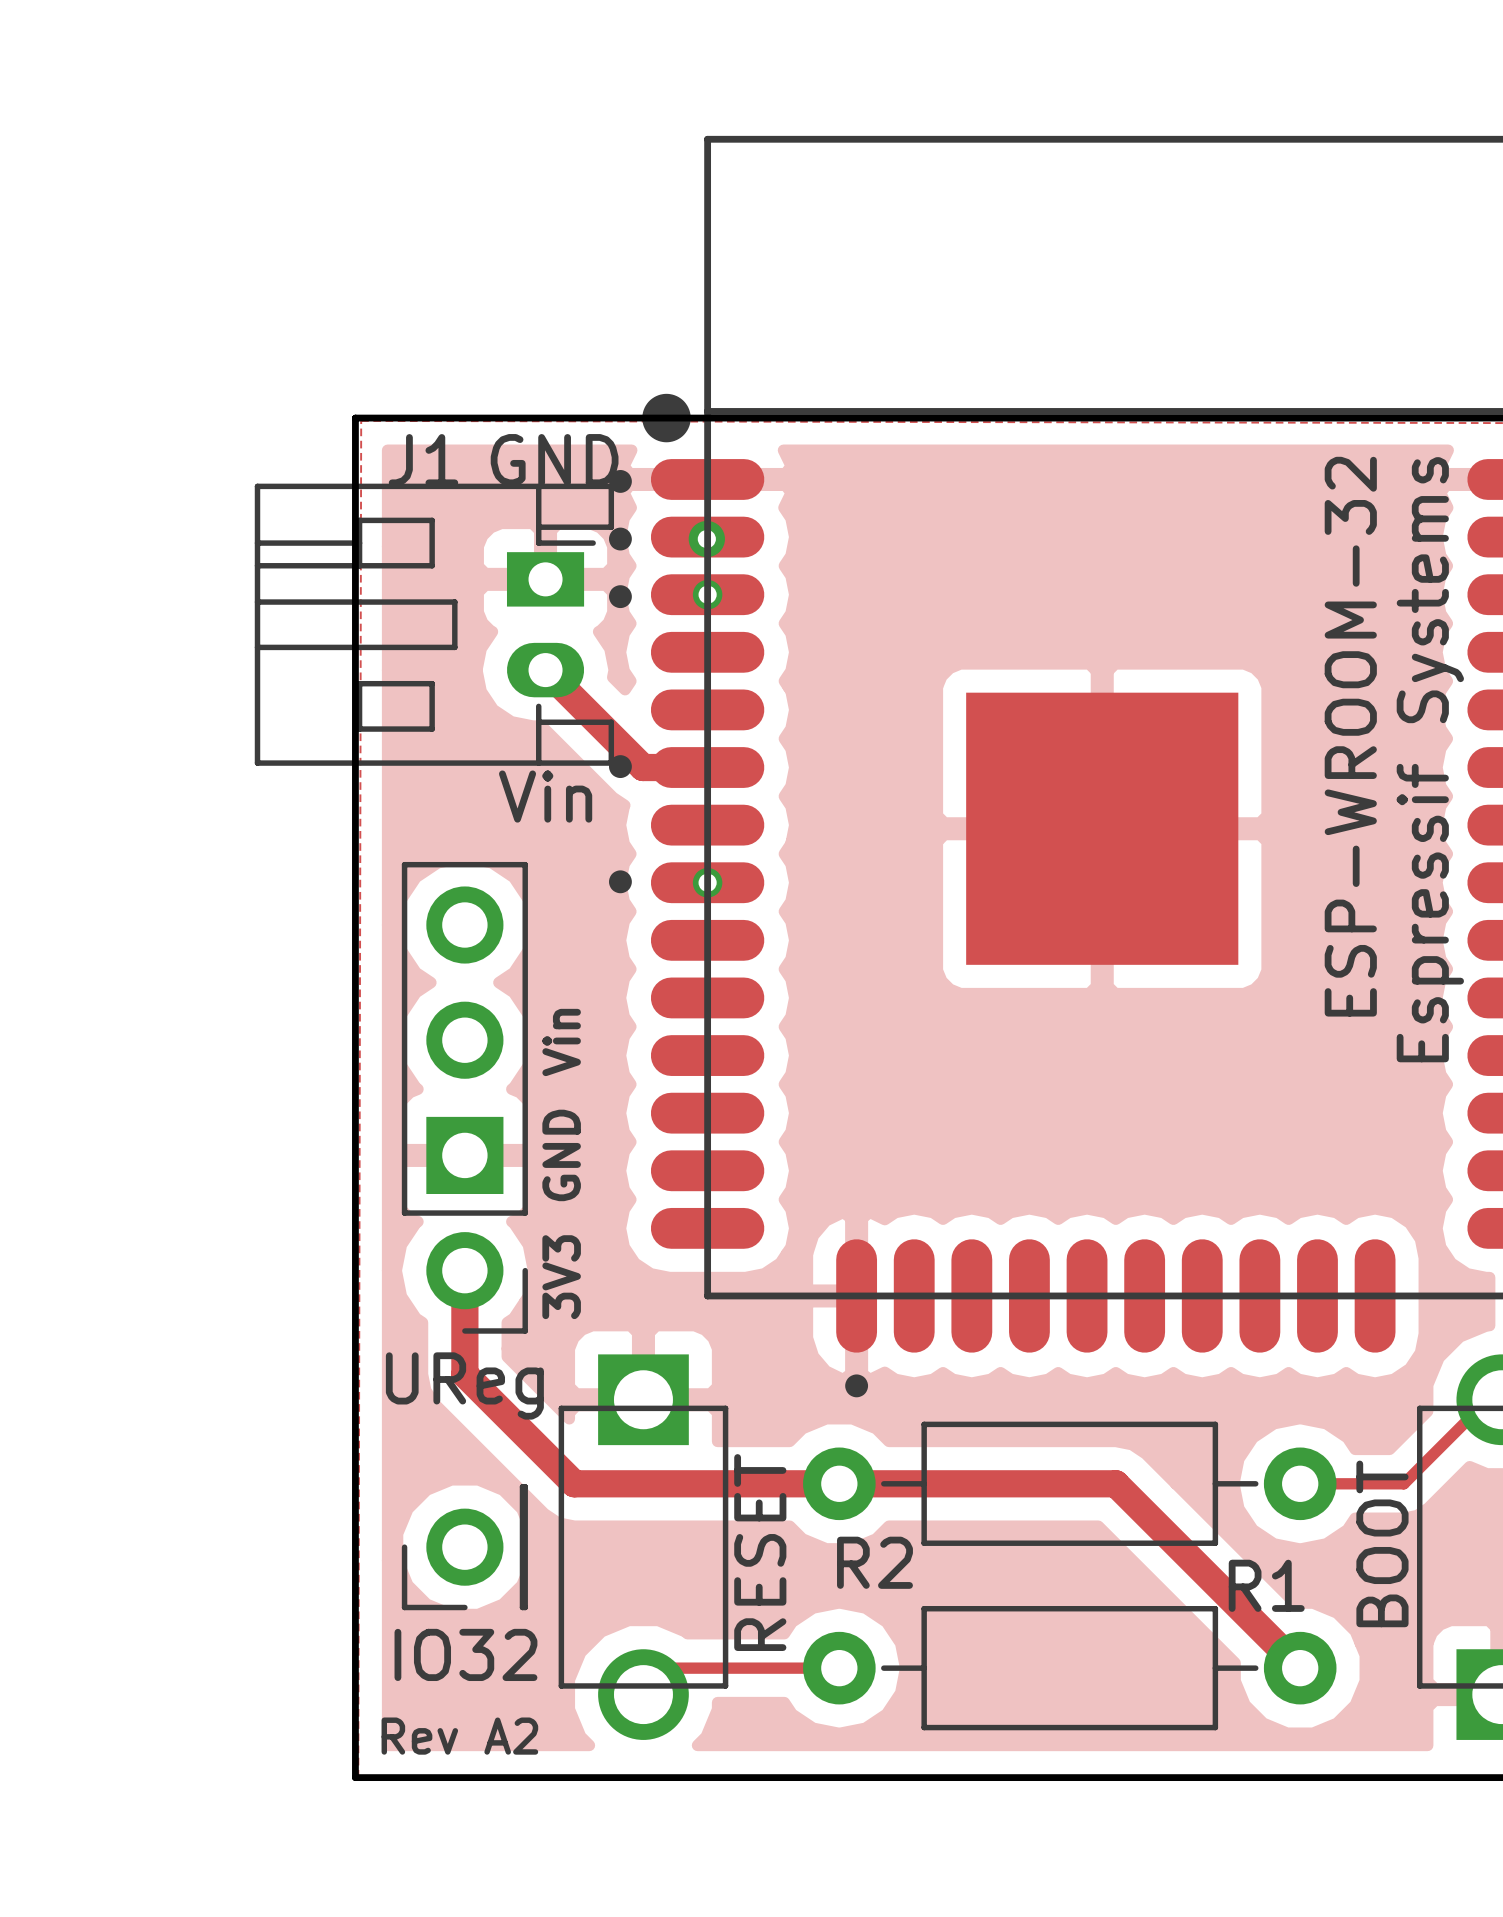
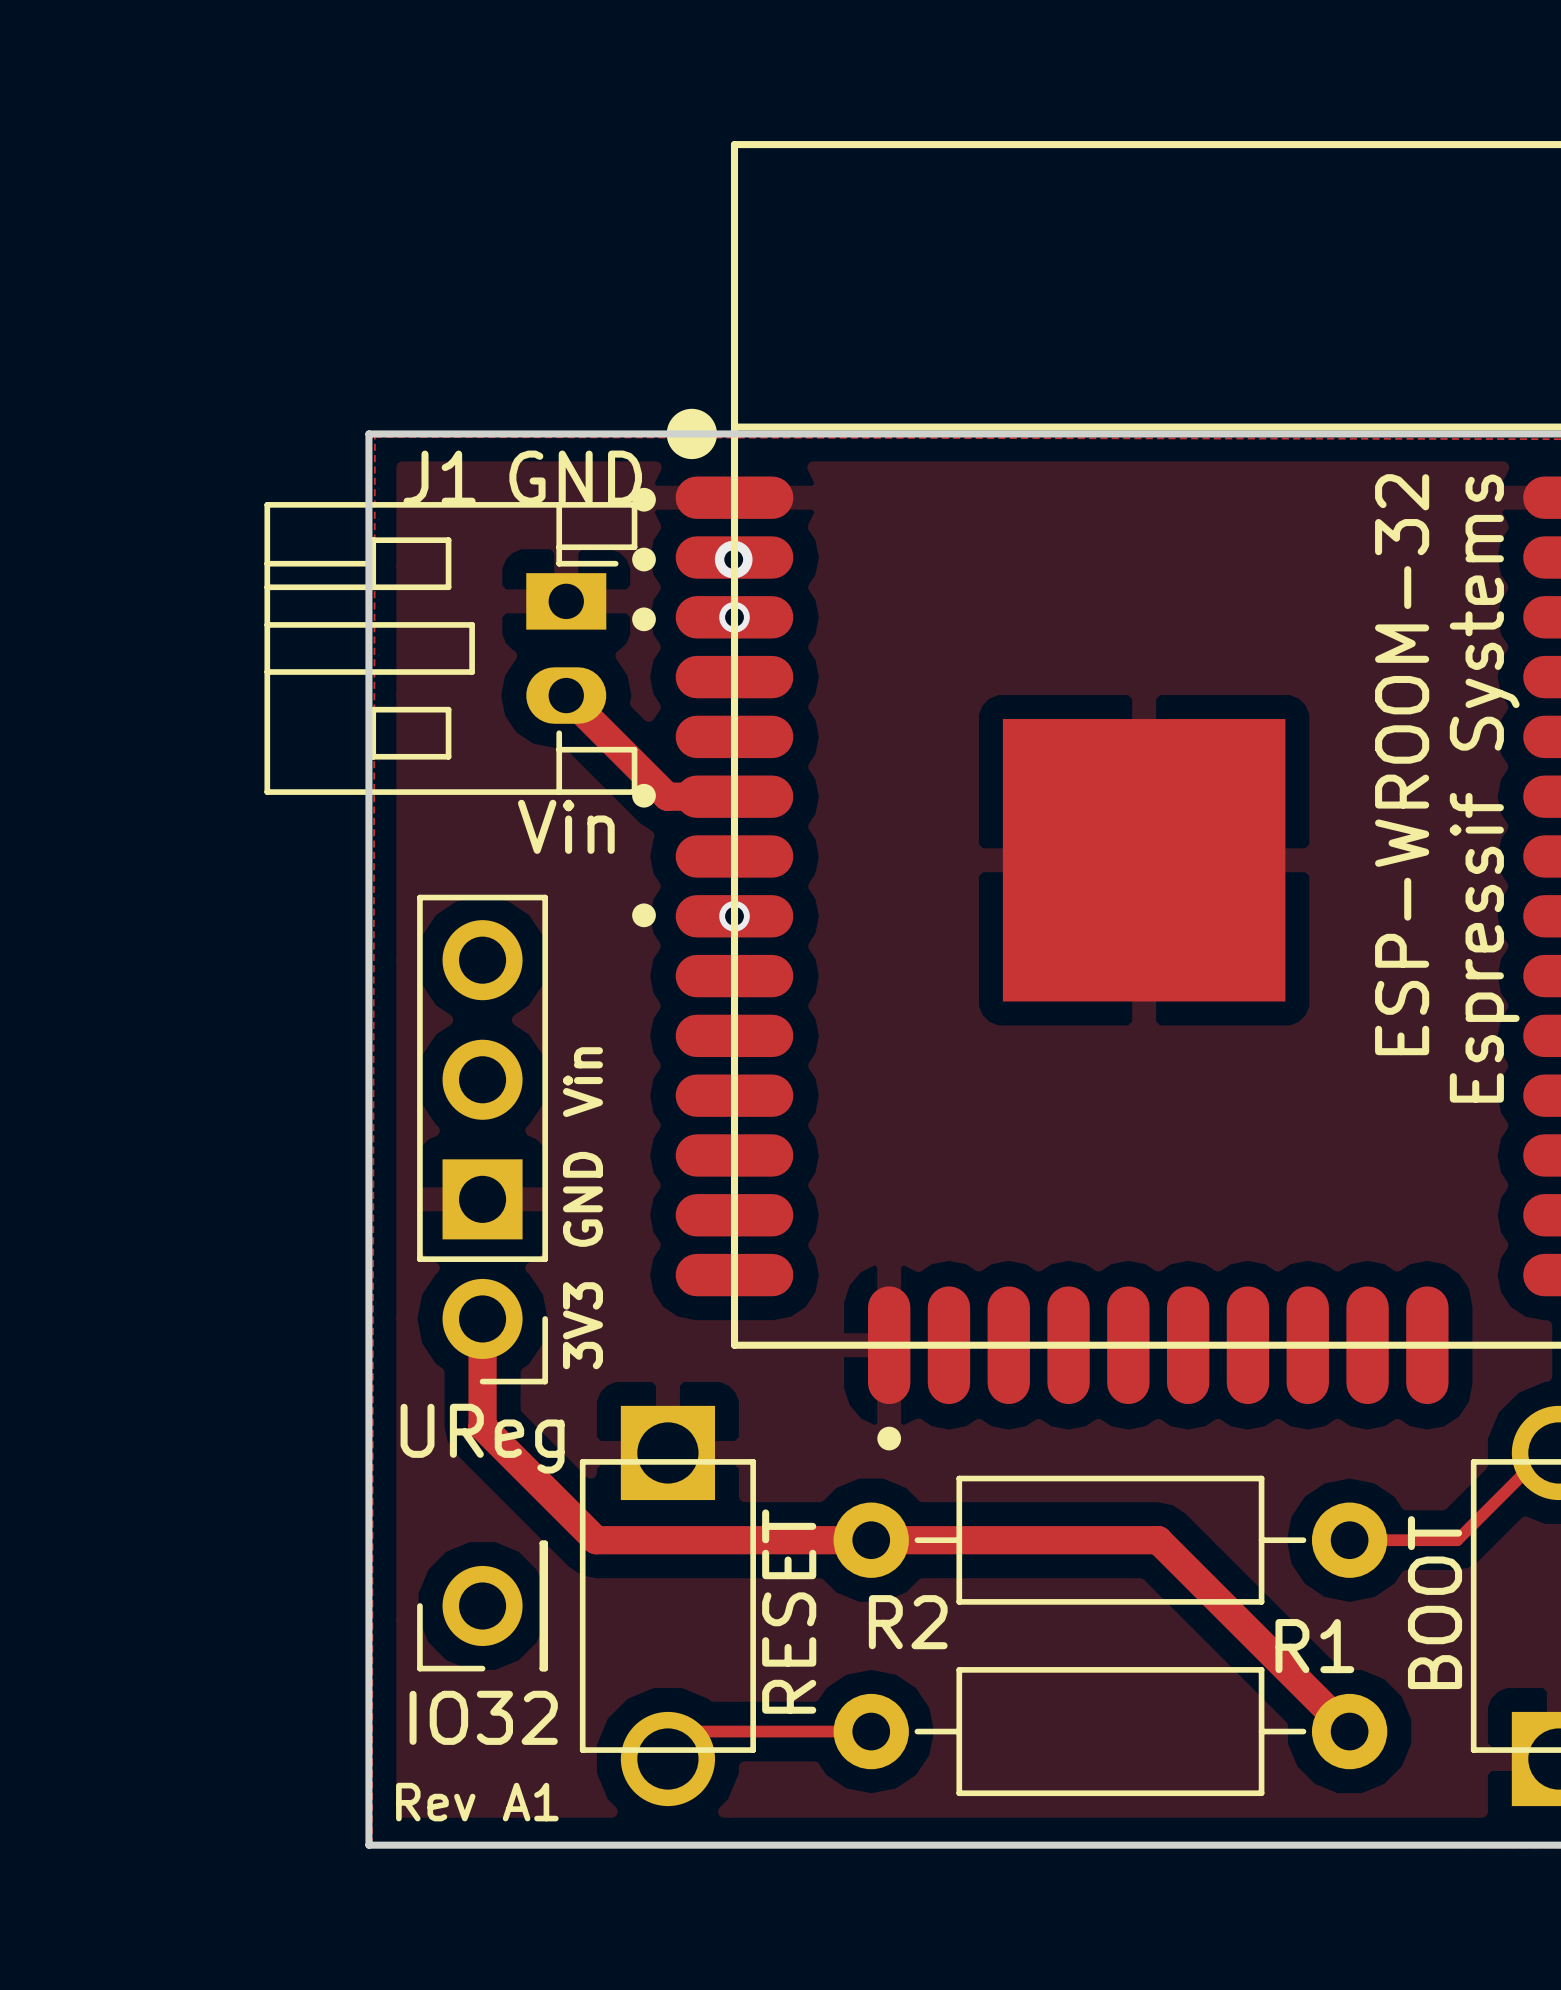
text: Rev A2 (459, 1736) -> Rev A1 (477, 1802)

